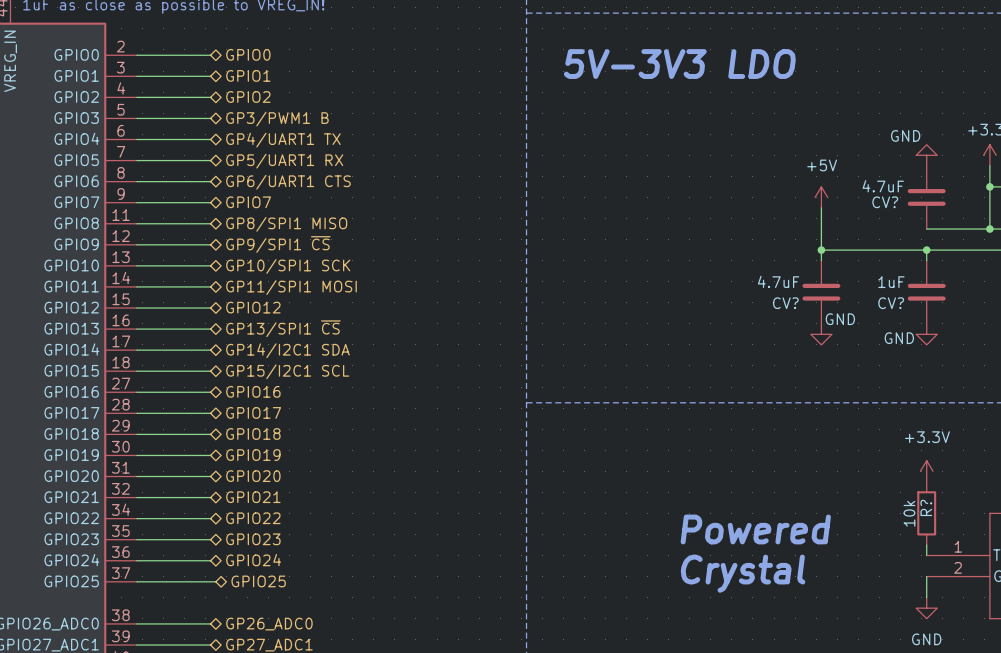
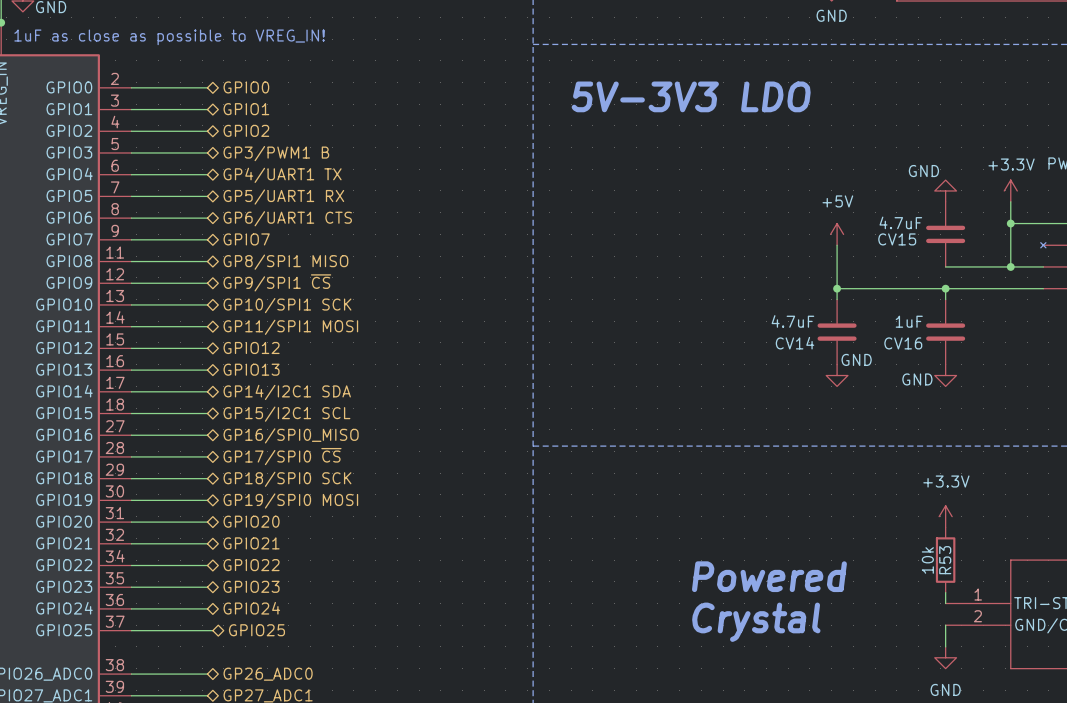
CV? name: CV? (885, 202) -> CV15 (897, 239)
CV? name: CV? (785, 303) -> CV14 (795, 343)
CV? name: CV? (891, 303) -> CV16 (903, 343)
hierarchical label: GP13/SPI1 ~{CS} (283, 328) -> GPIO13 (251, 369)
hierarchical label: GPIO16 (253, 391) -> GP16/SPI0_MISO (291, 435)
hierarchical label: GPIO17 (253, 412) -> GP17/SPI0 ~{CS} (282, 456)
hierarchical label: GPIO18 (253, 433) -> GP18/SPI0 SCK (287, 479)
hierarchical label: GPIO19 (253, 455) -> GP19/SPI0 MOSI (290, 501)
R? name: R? (926, 507) -> R53 (945, 560)

